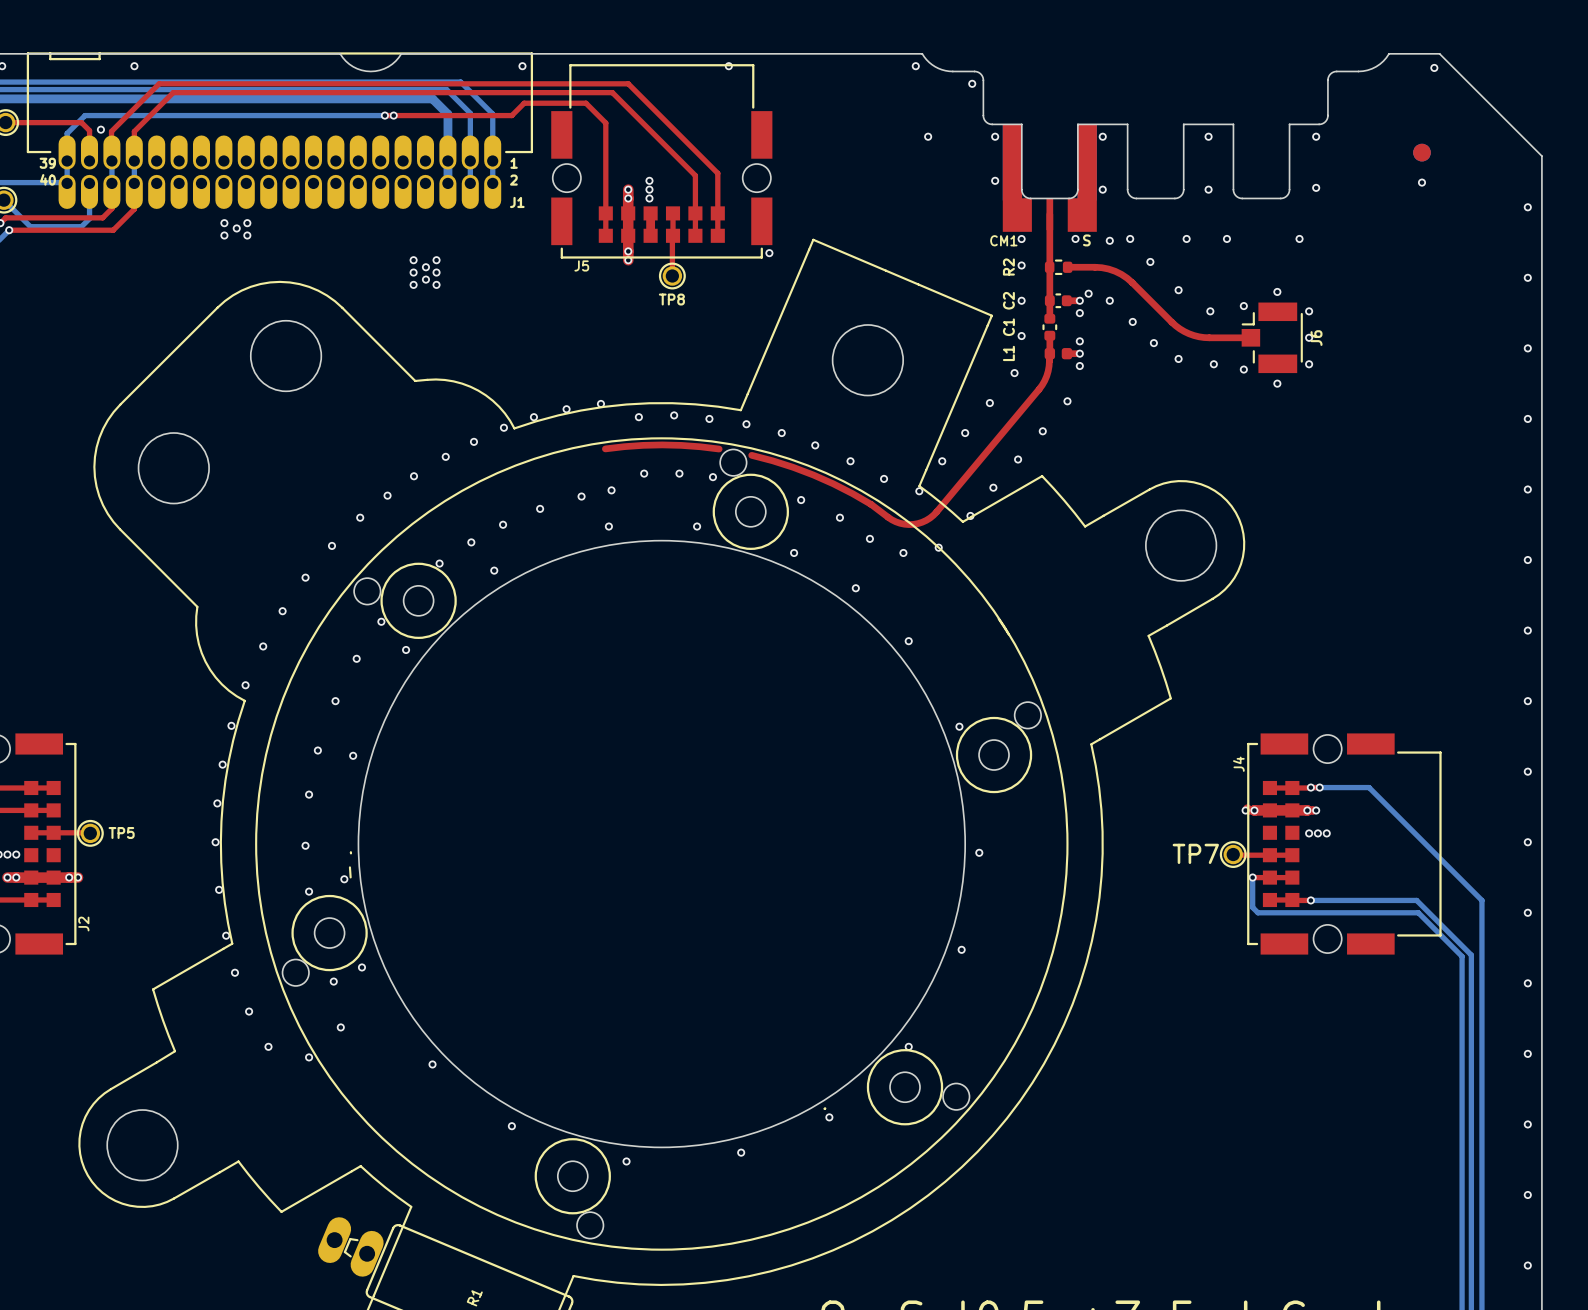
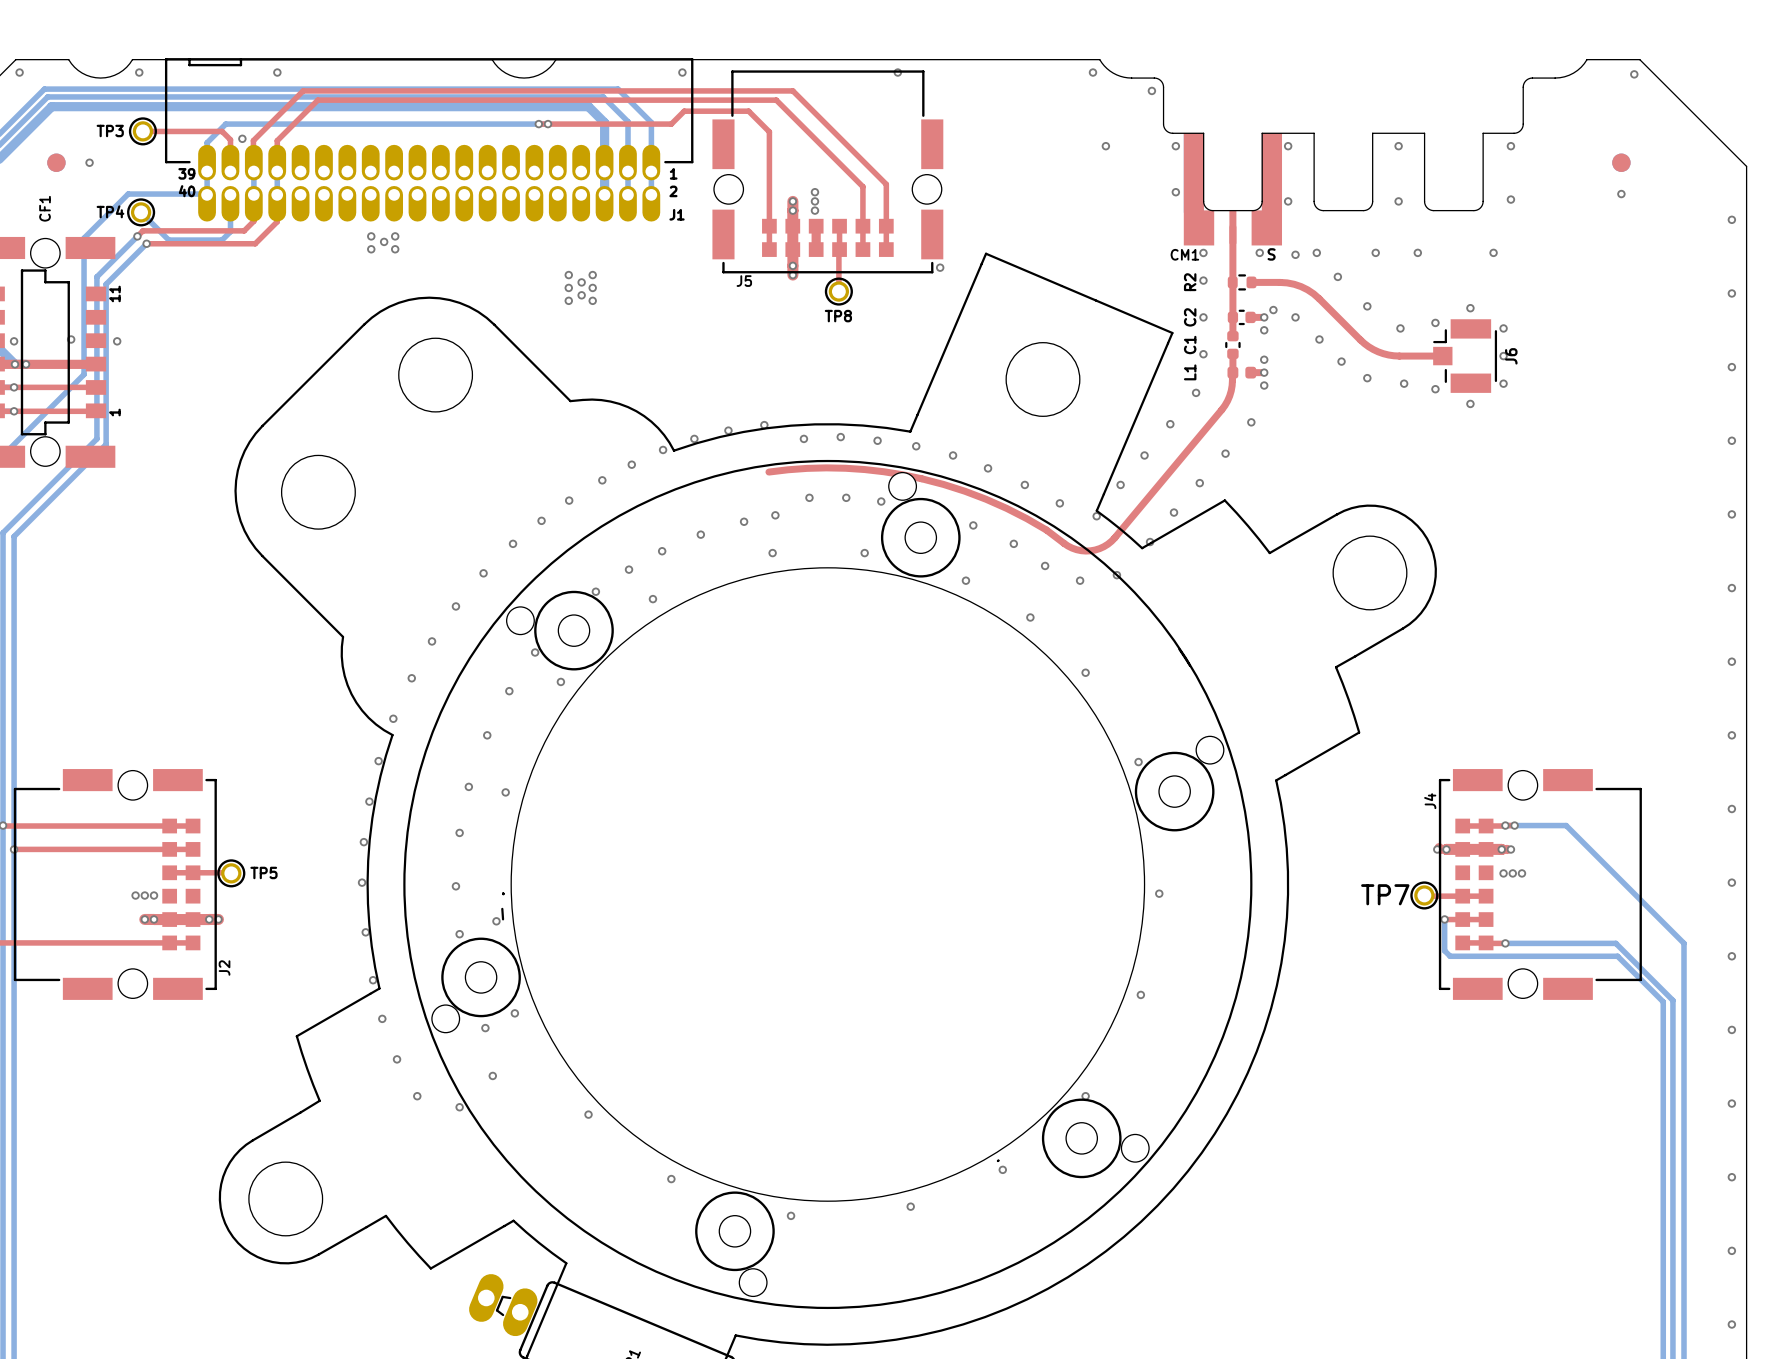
top track: (605, 448) (662, 444) (719, 449) -> (768, 472) (807, 468) (845, 468) (883, 471) (921, 478)

